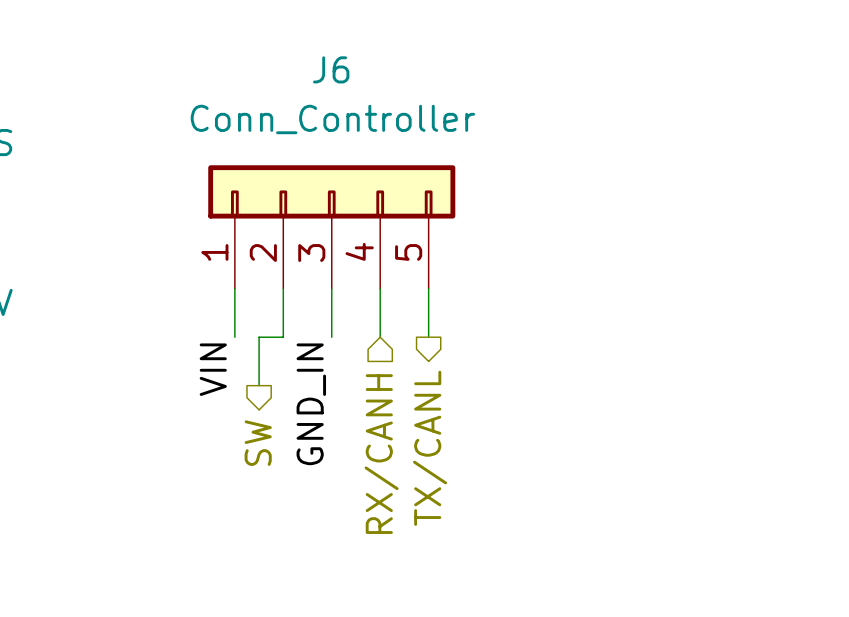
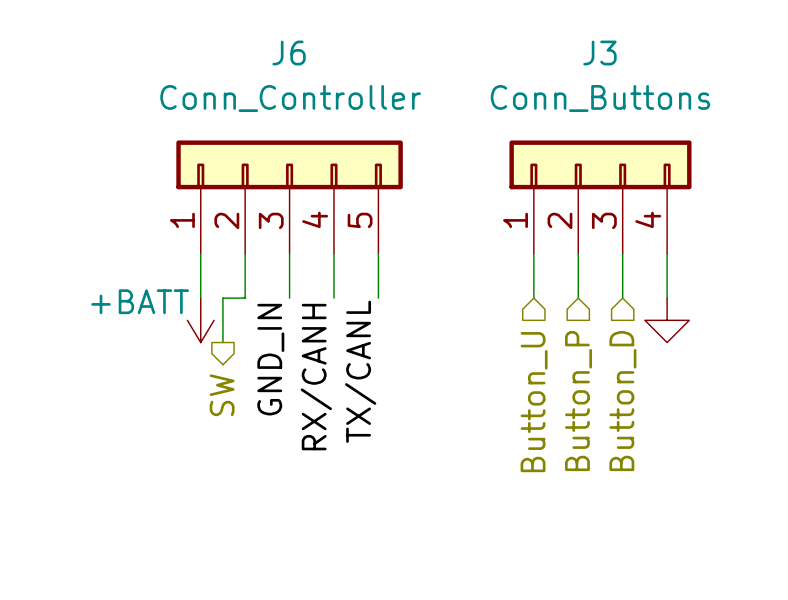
J3: none -> Conn_Buttons (600, 197)
wire: none -> (533, 253) (533, 298)
wire: none -> (578, 253) (578, 298)
wire: none -> (622, 253) (622, 298)
wire: none -> (667, 253) (667, 298)
power symbol: none -> +BATT (200, 320)
power symbol: none -> (667, 320)
label: VIN (213, 369) -> none
label: none -> TX/CANL (360, 371)
label: none -> RX/CANH (316, 377)
hierarchical label: TX/CANL (430, 448) -> none
hierarchical label: none -> Button_P (578, 401)
hierarchical label: none -> Button_D (622, 401)
hierarchical label: none -> Button_U (534, 402)
hierarchical label: RX/CANH (381, 454) -> none

